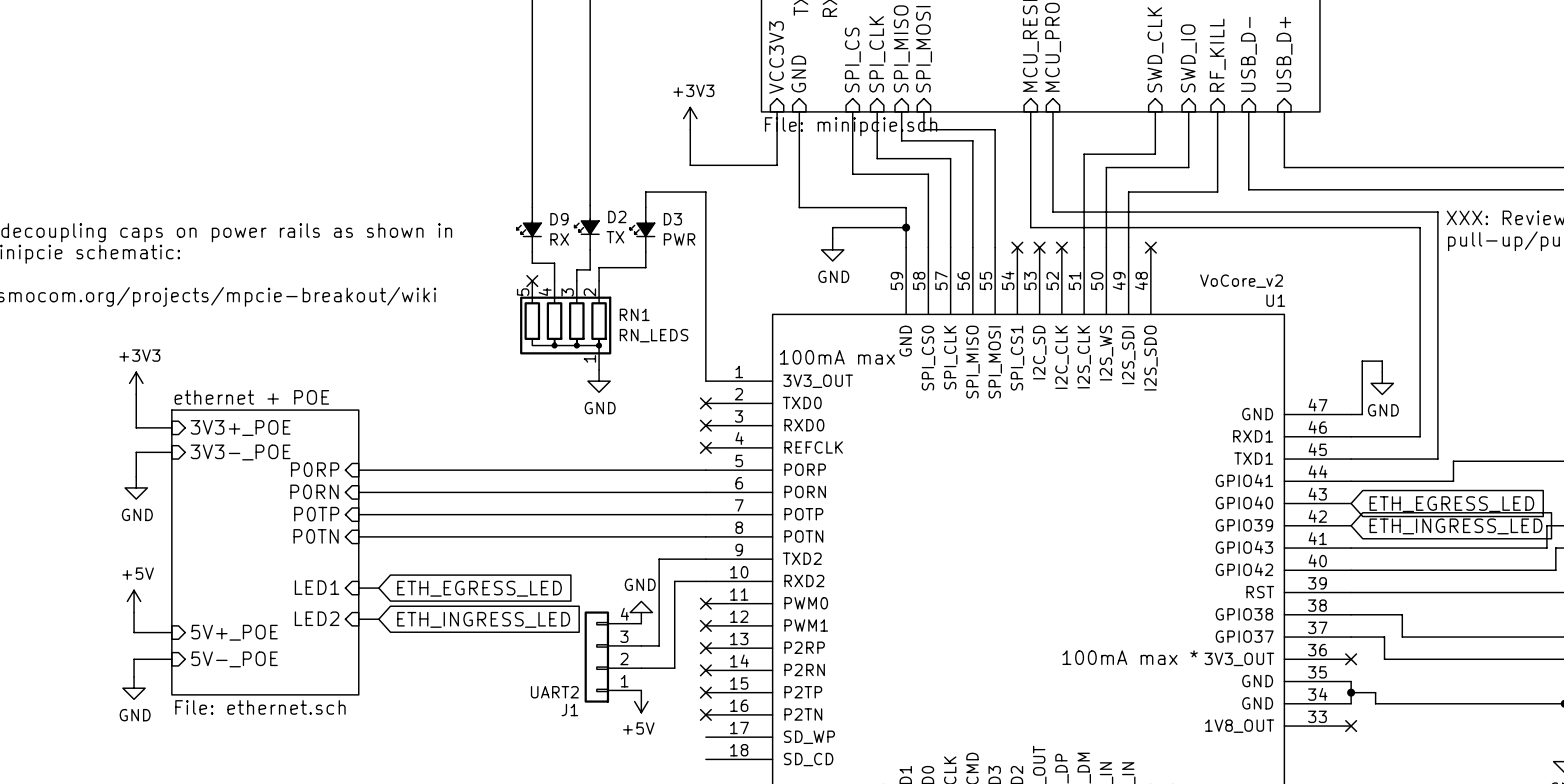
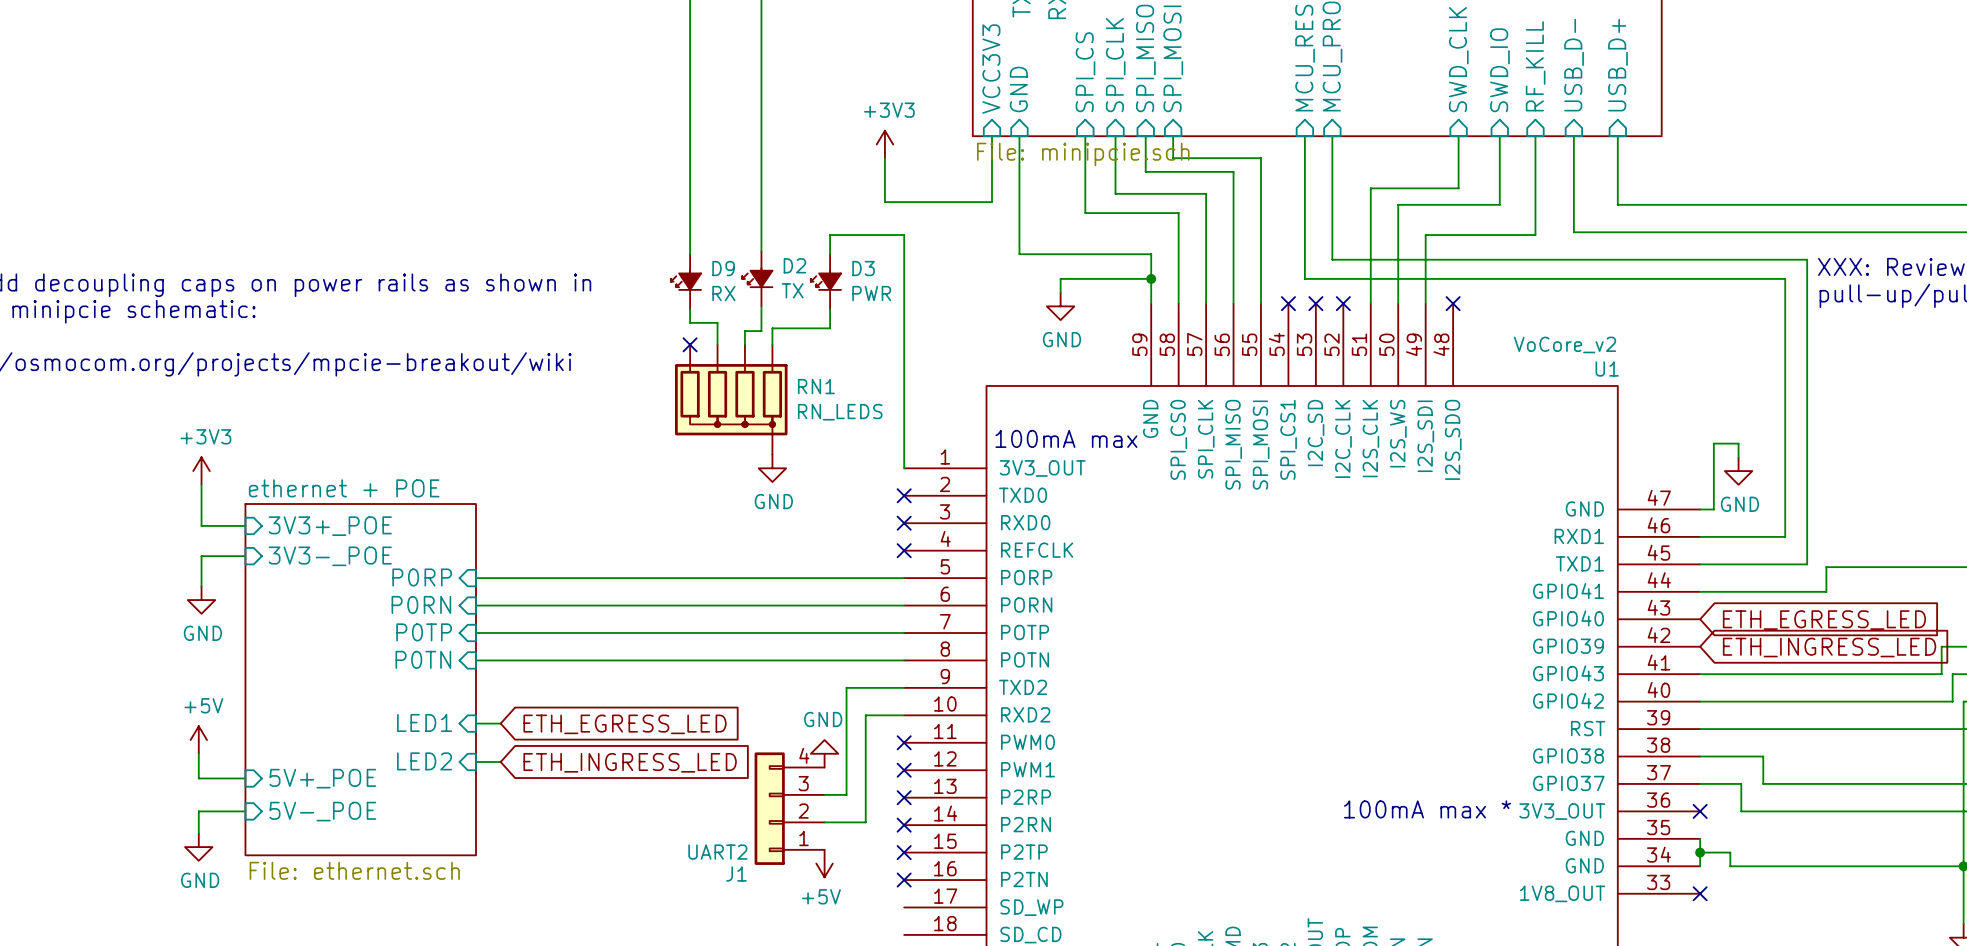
RN1 pin number: 4 (545, 291) -> none
RN1 pin number: 5 (523, 292) -> none
RN1 pin number: 3 (567, 292) -> none
RN1 pin number: 2 (589, 292) -> none
RN1 pin number: 1 (589, 358) -> none

